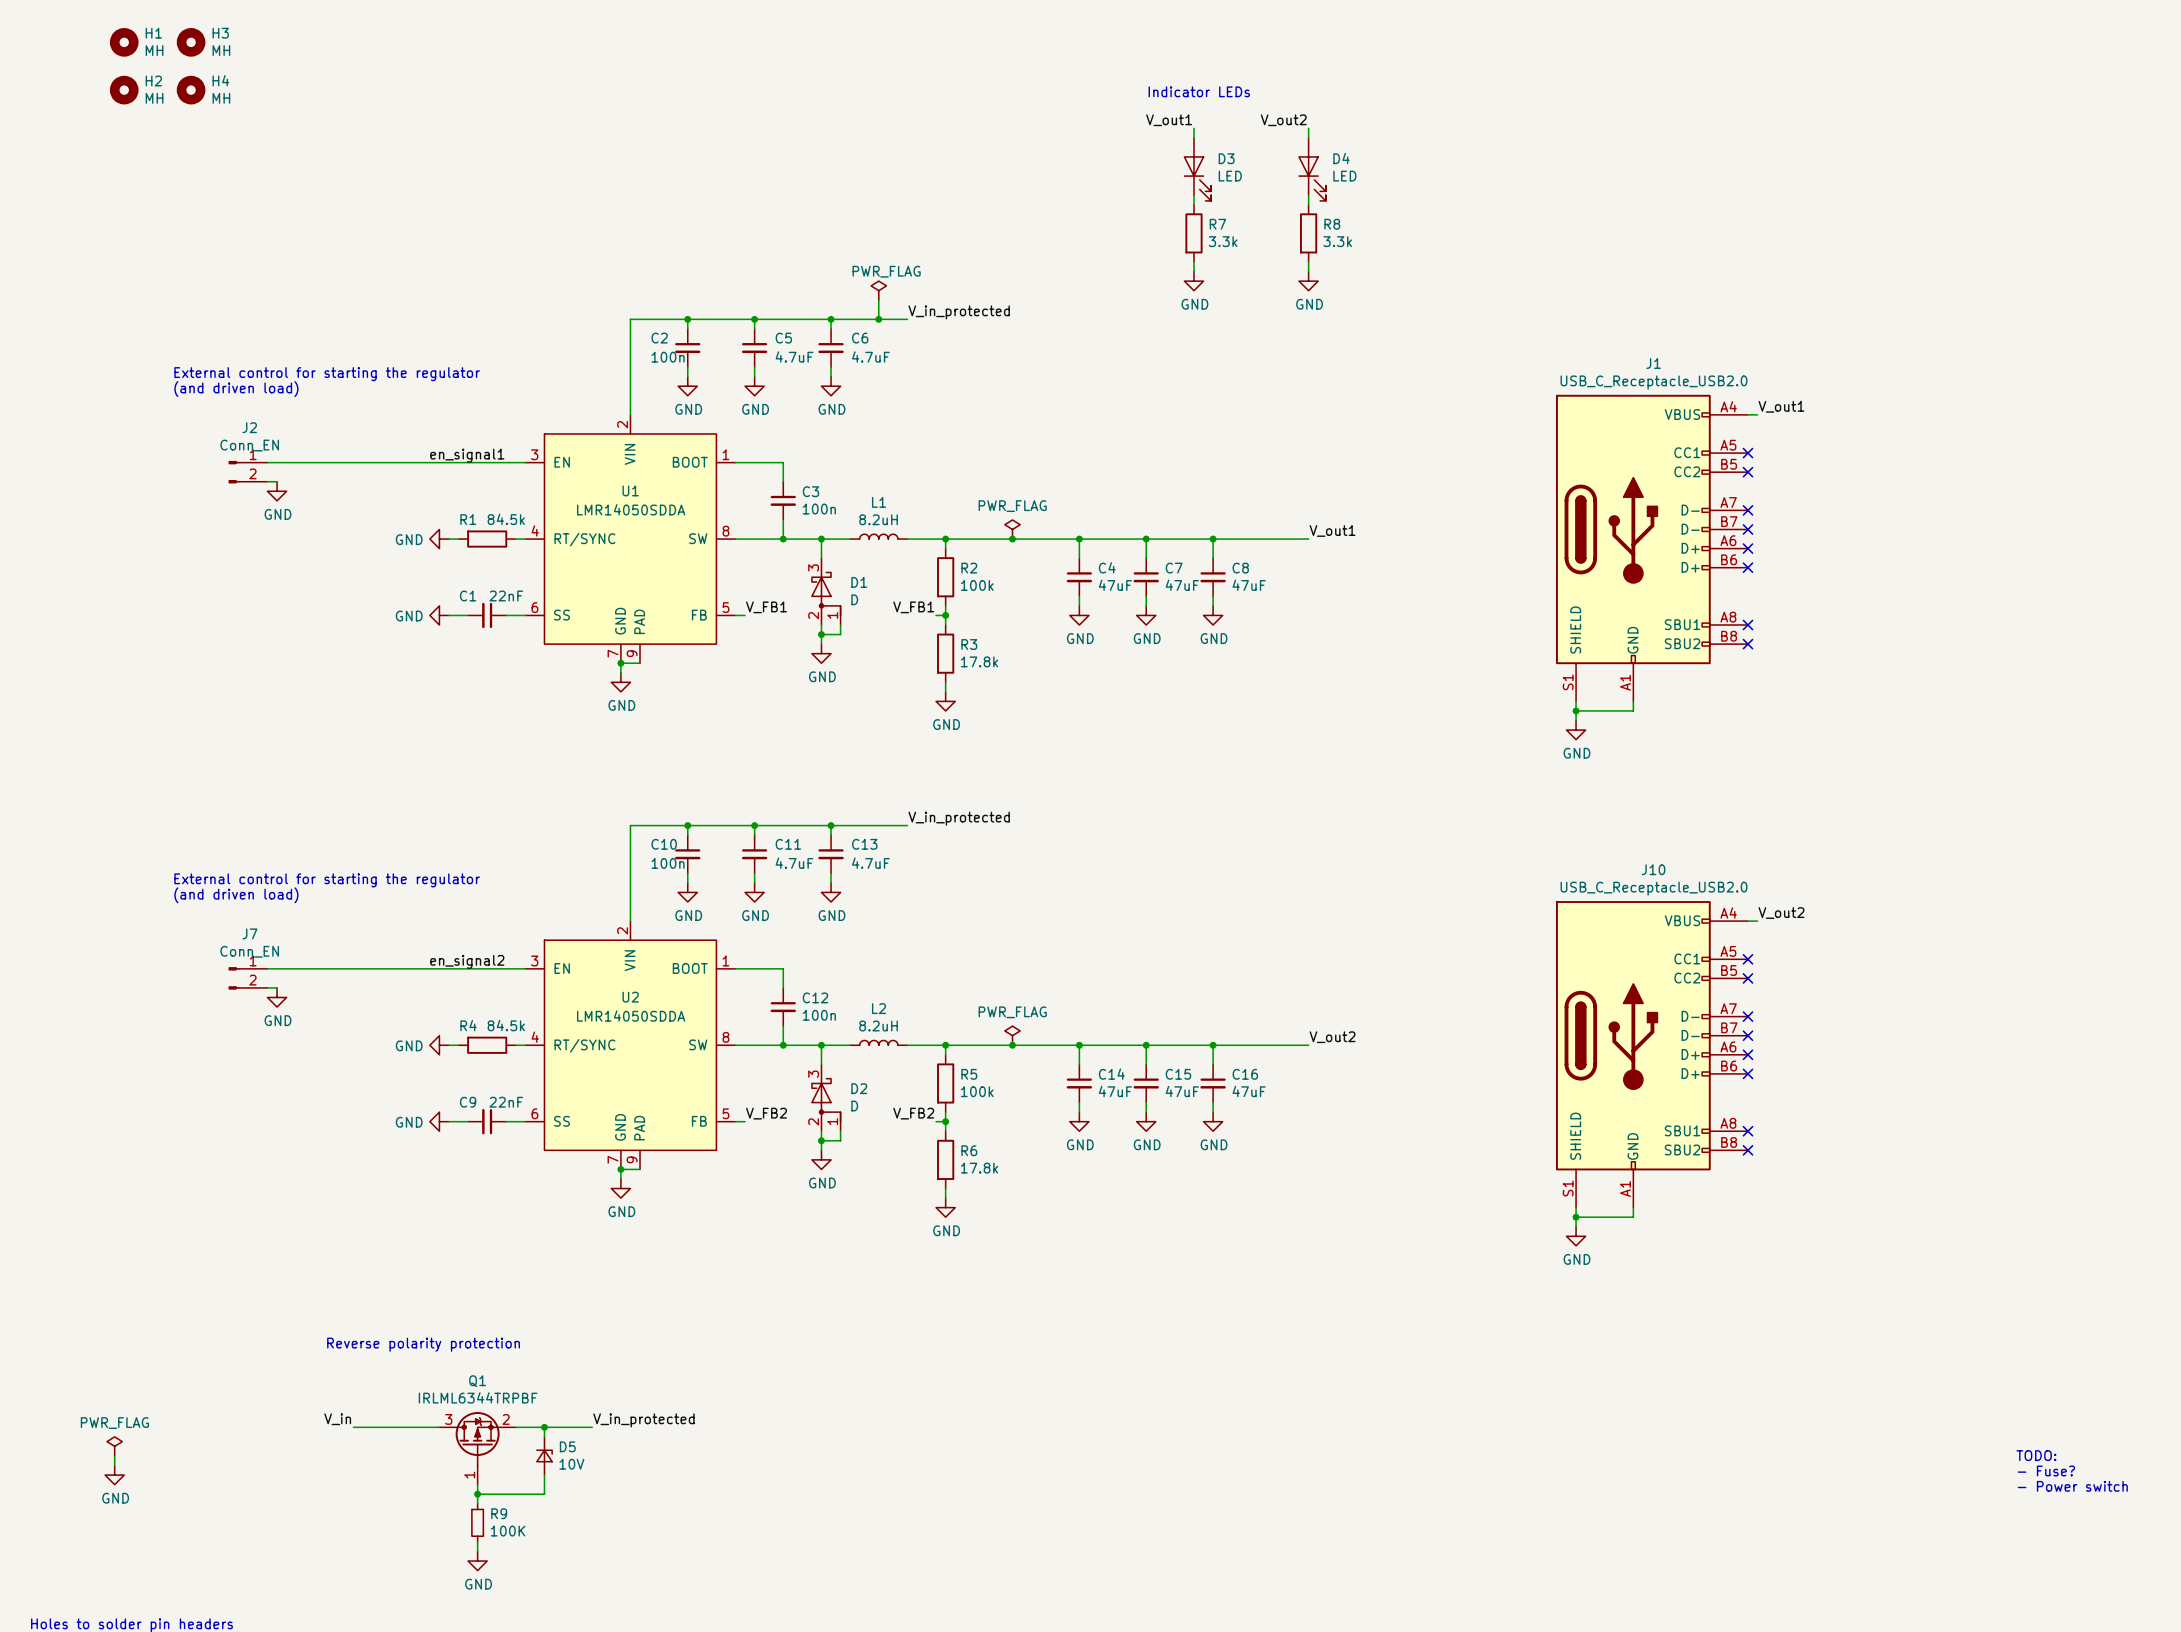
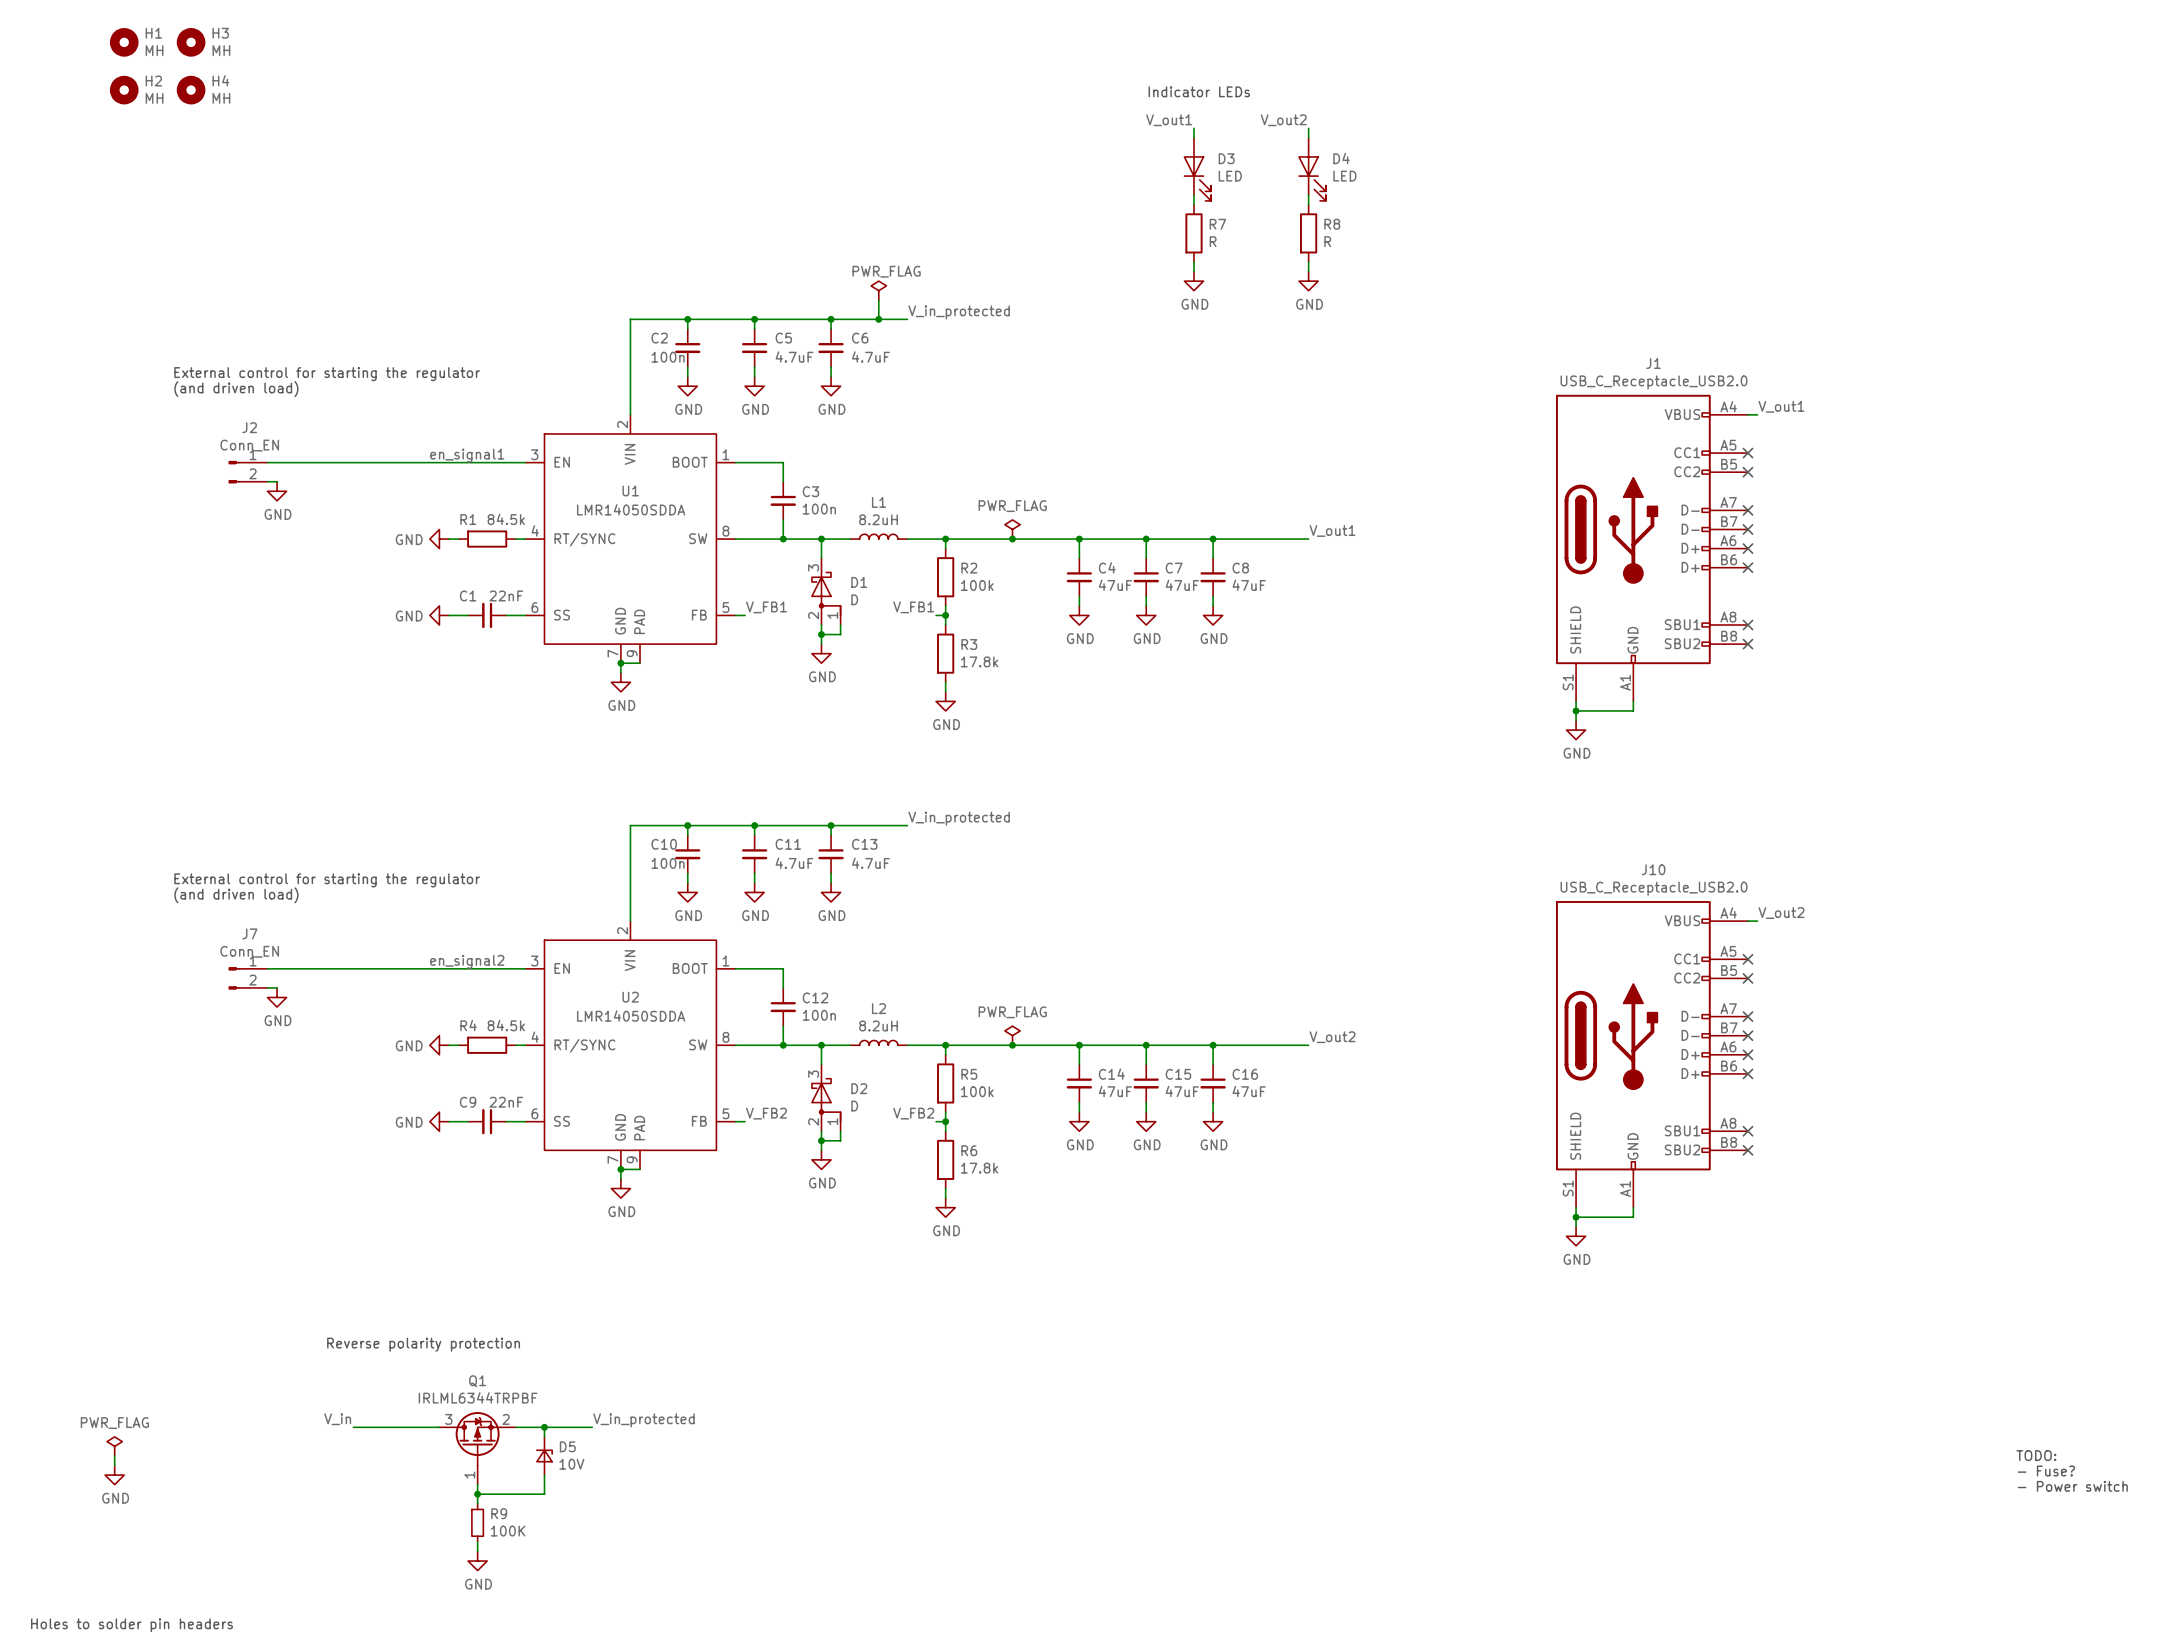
R7 value: 3.3k (1223, 241) -> R (1213, 241)
R8 value: 3.3k (1337, 241) -> R (1327, 241)

